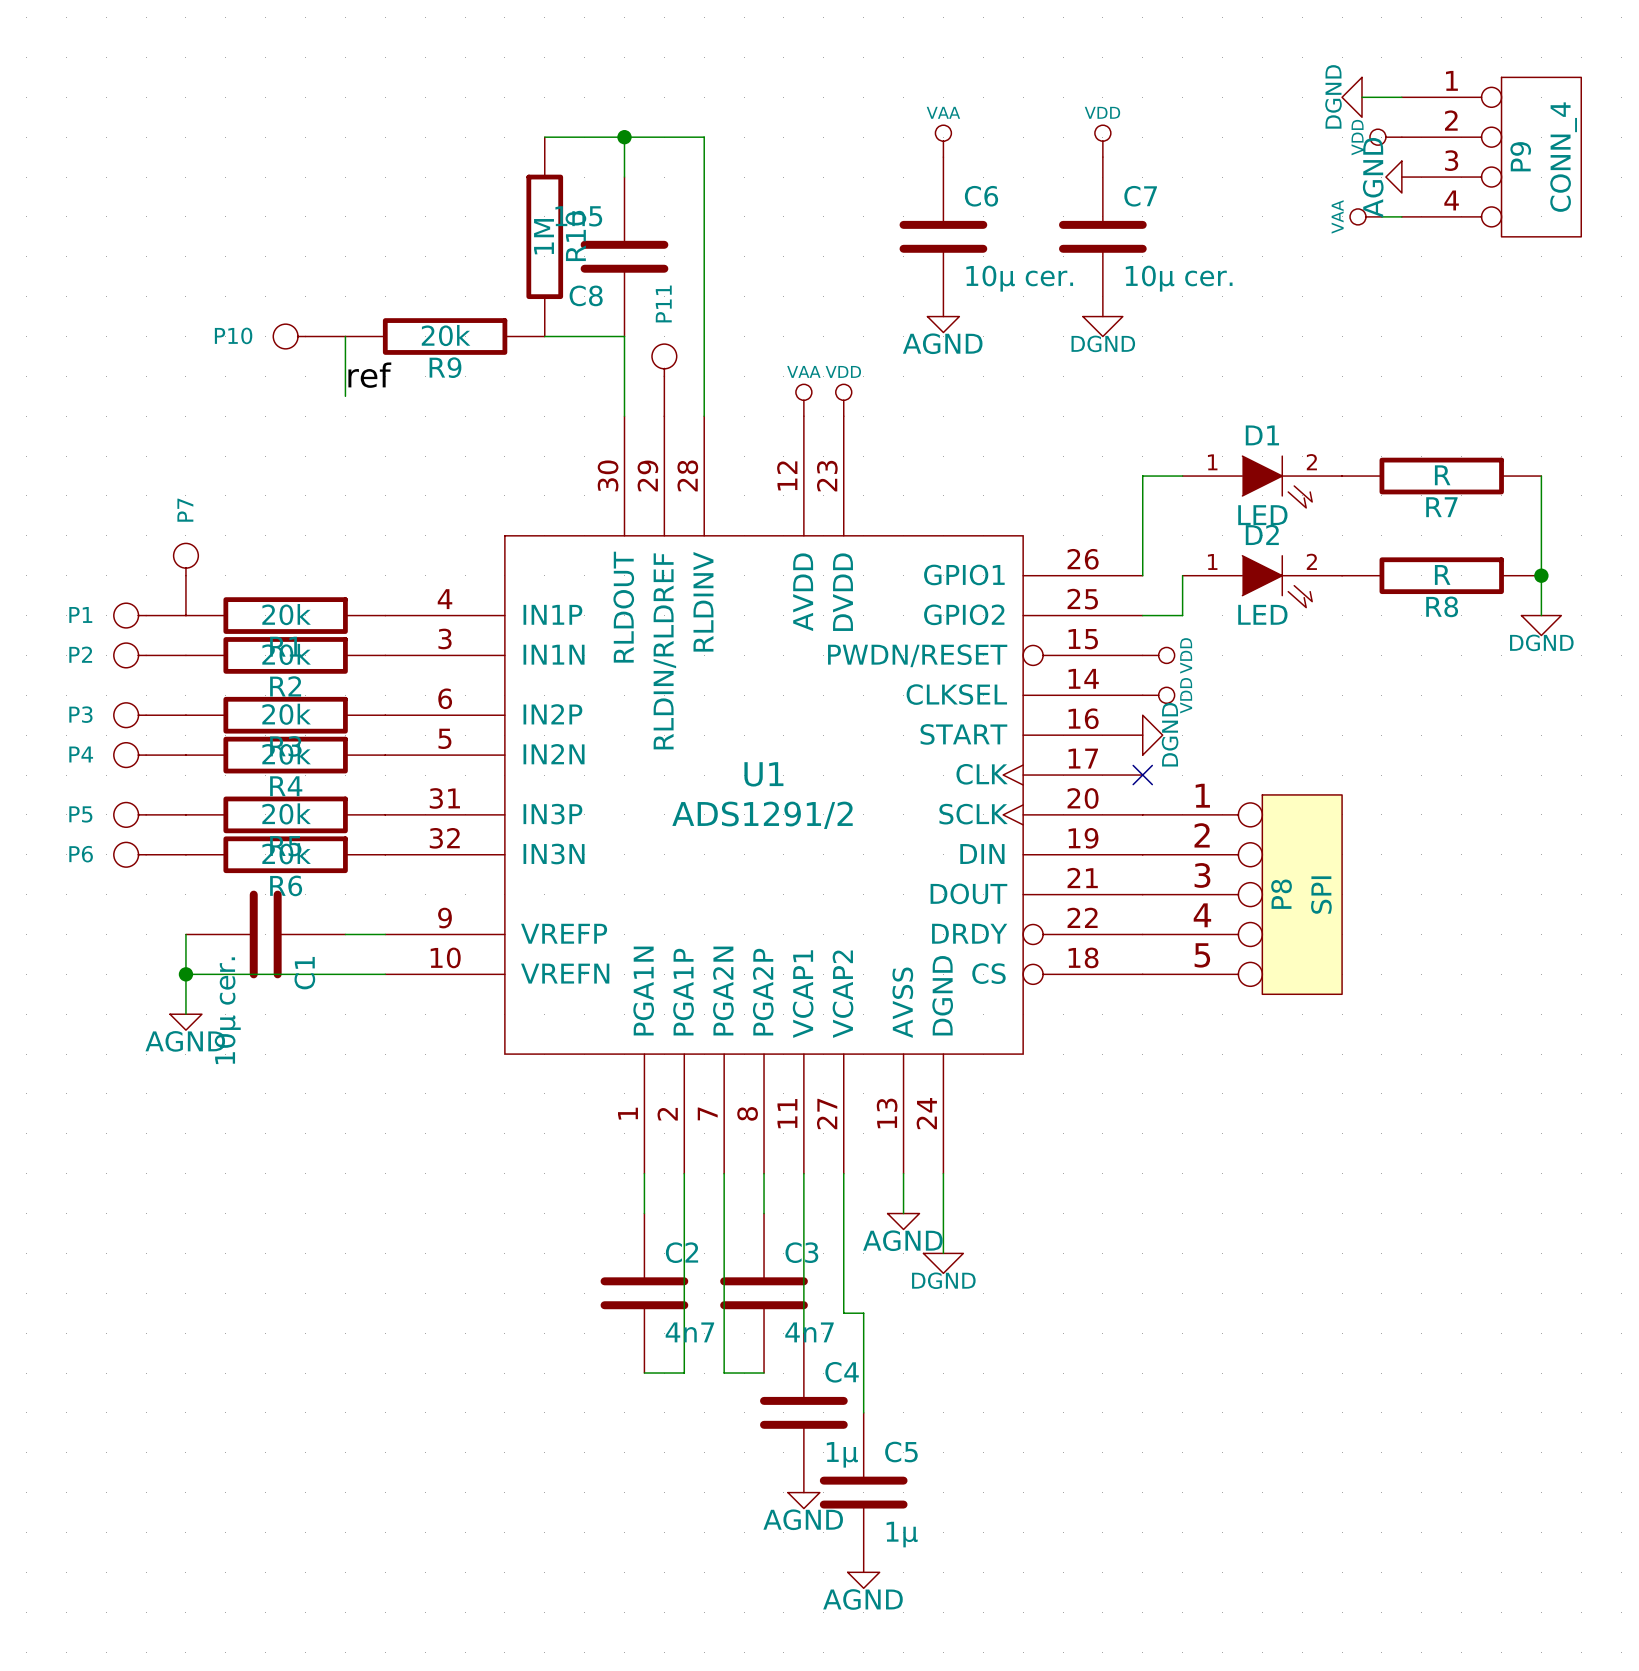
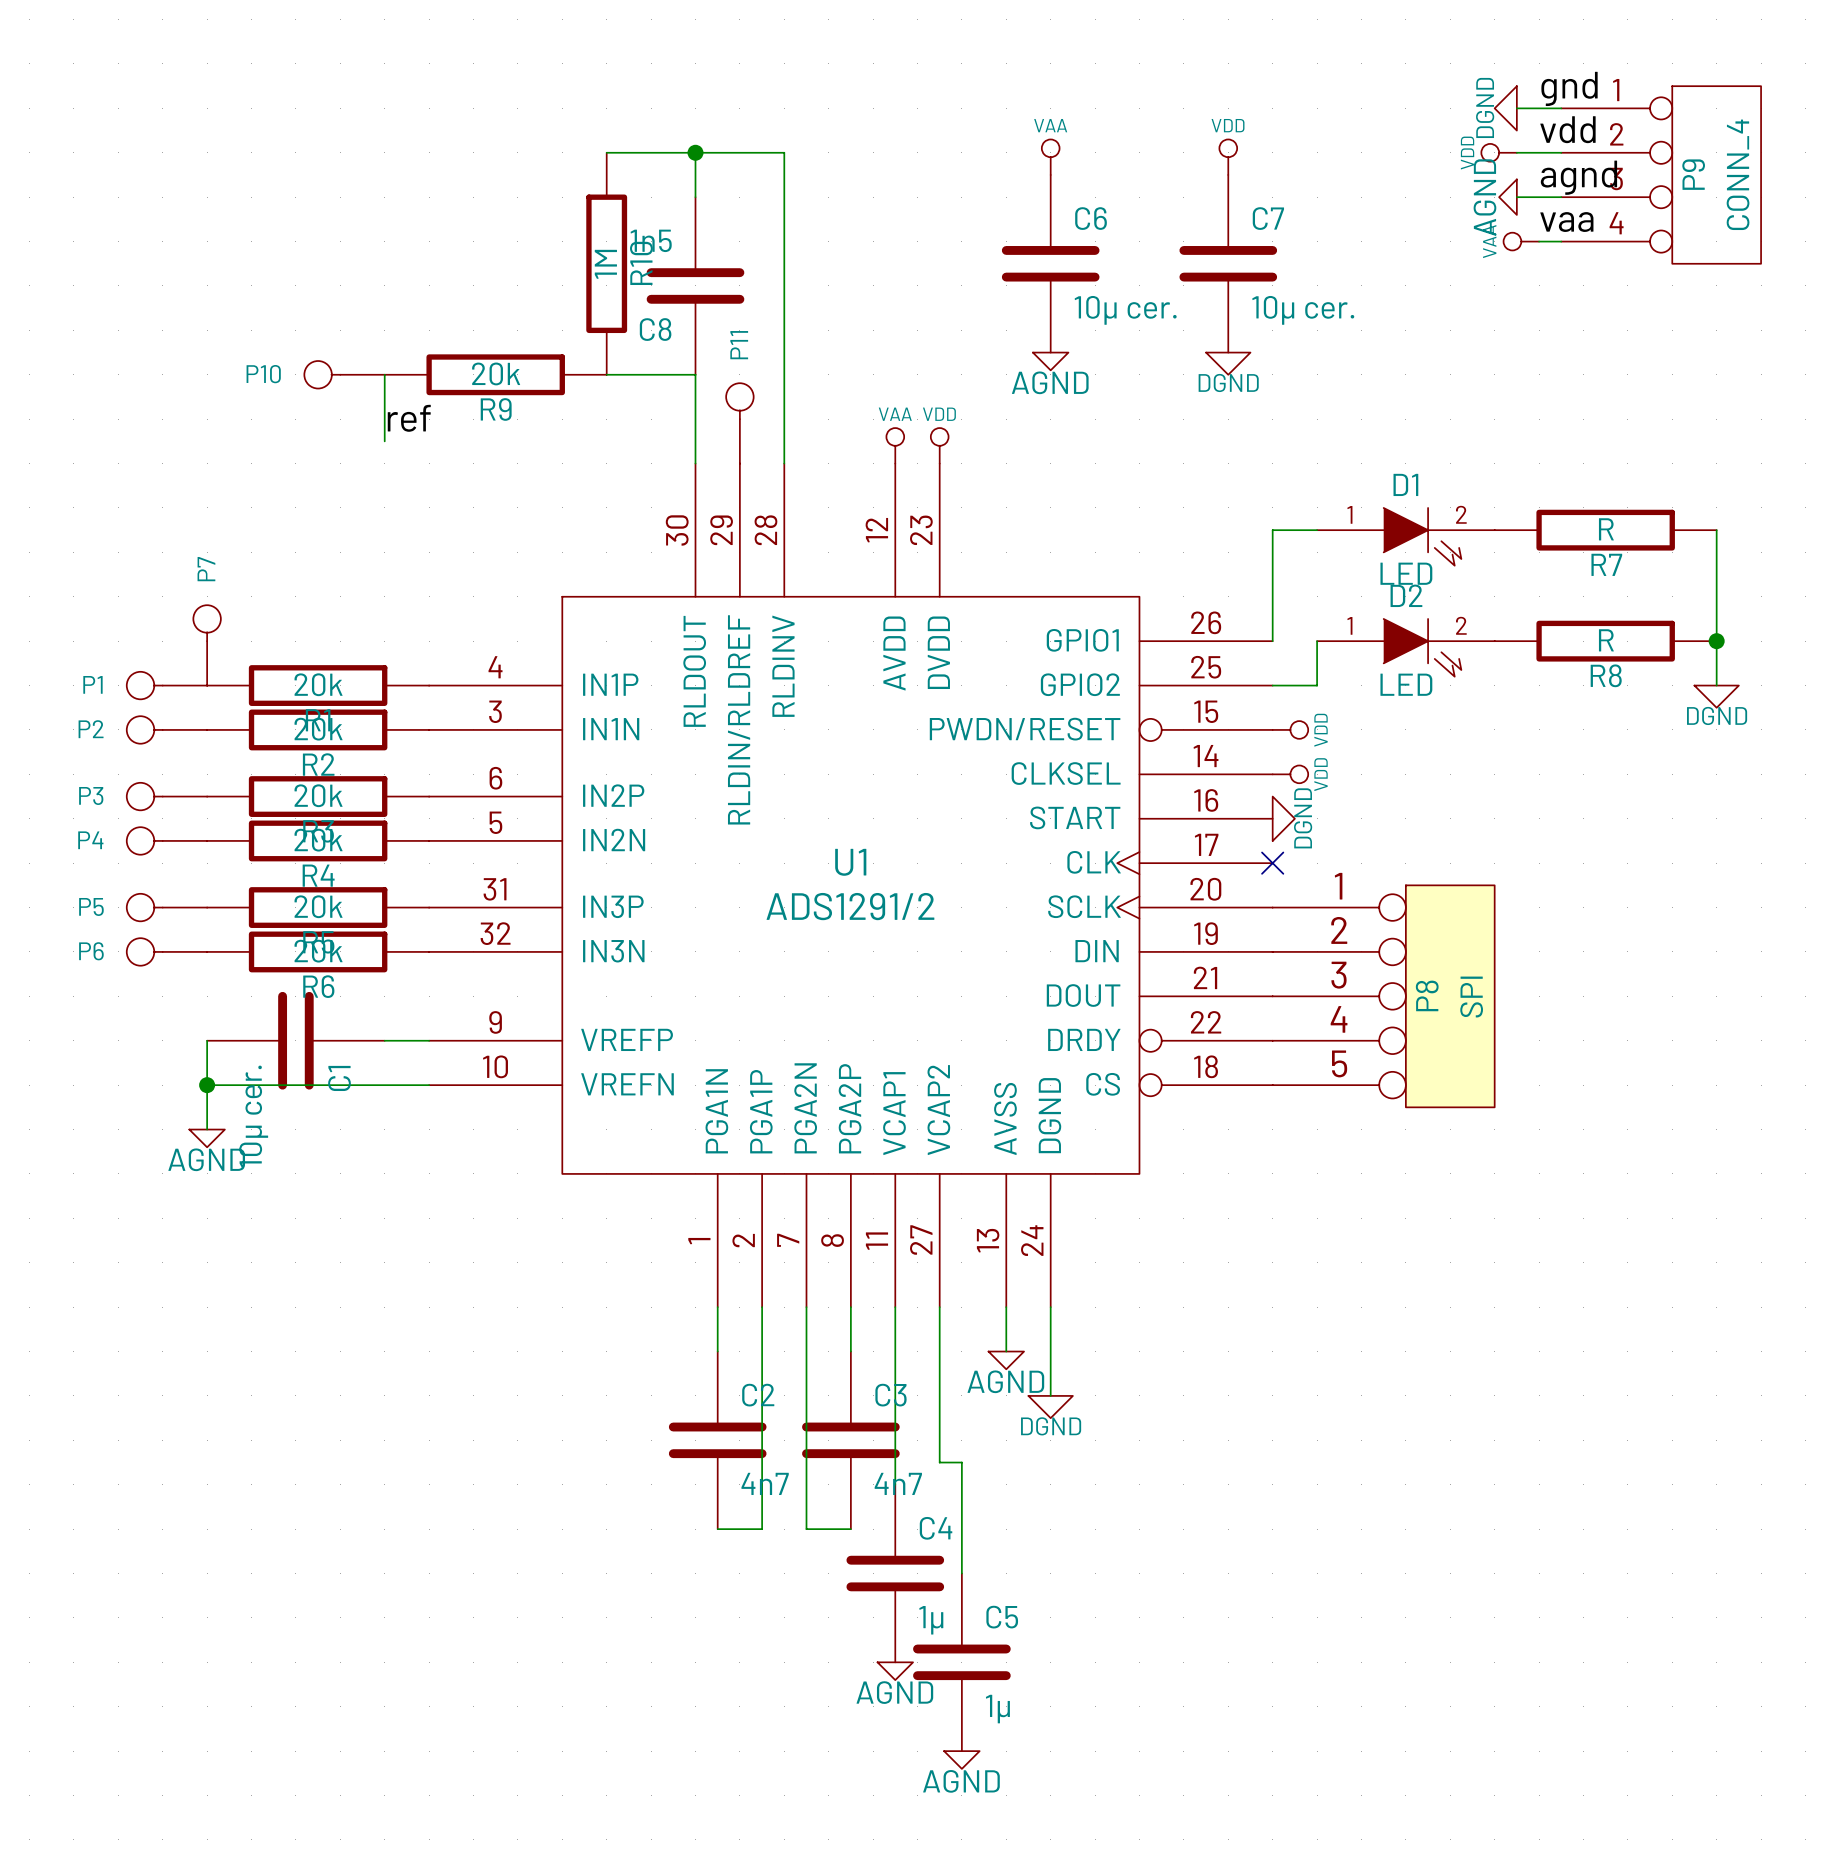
label: none -> gnd (1569, 88)
label: none -> vdd (1567, 129)
wire: none -> (1516, 152) (1561, 152)
power symbol position: VDD (1385, 137) -> VDD (1499, 152)
label: none -> agnd (1578, 177)
wire: none -> (1516, 197) (1561, 197)
power symbol position: AGND (1393, 177) -> AGND (1507, 197)
label: none -> vaa (1566, 222)

